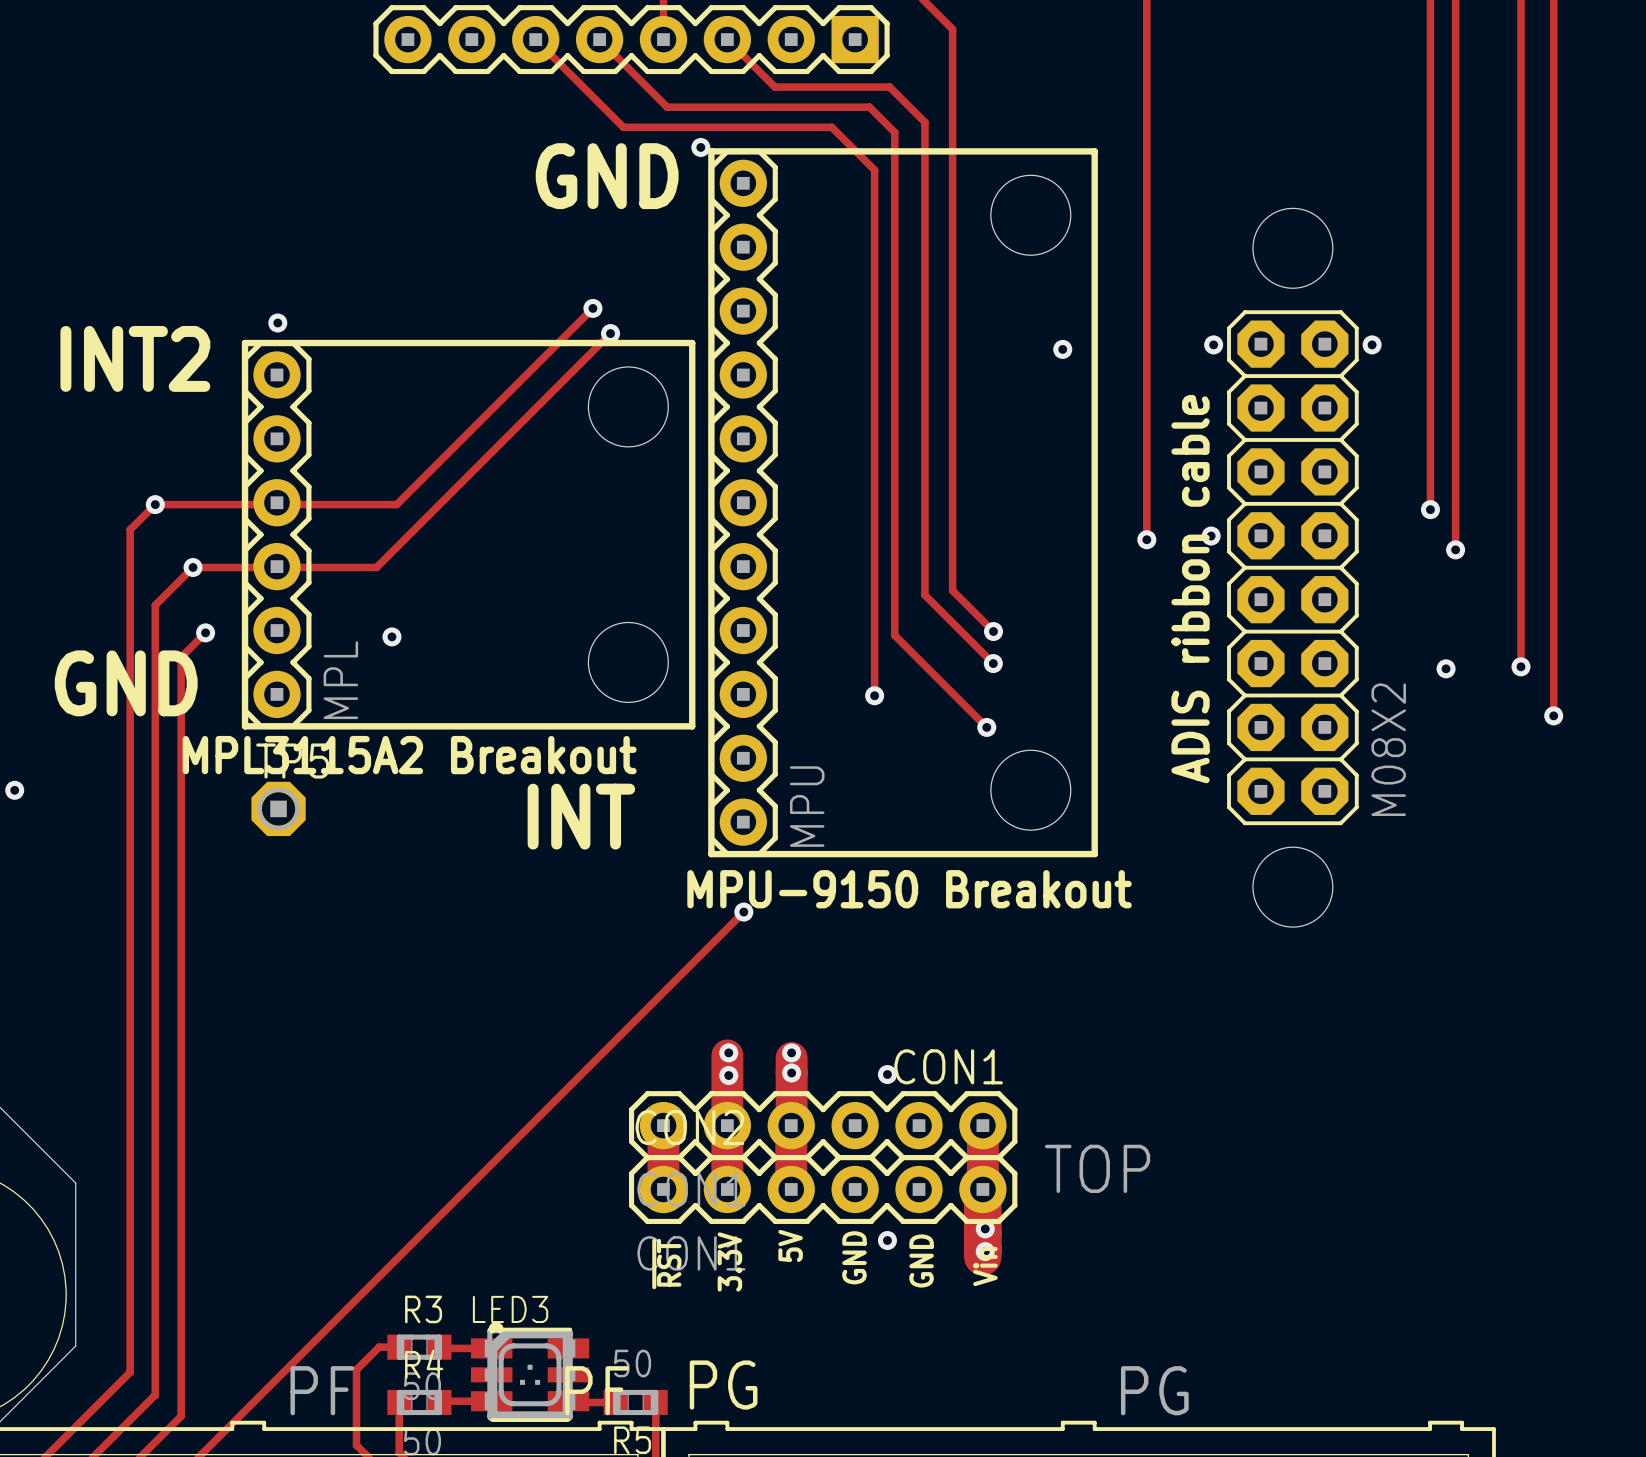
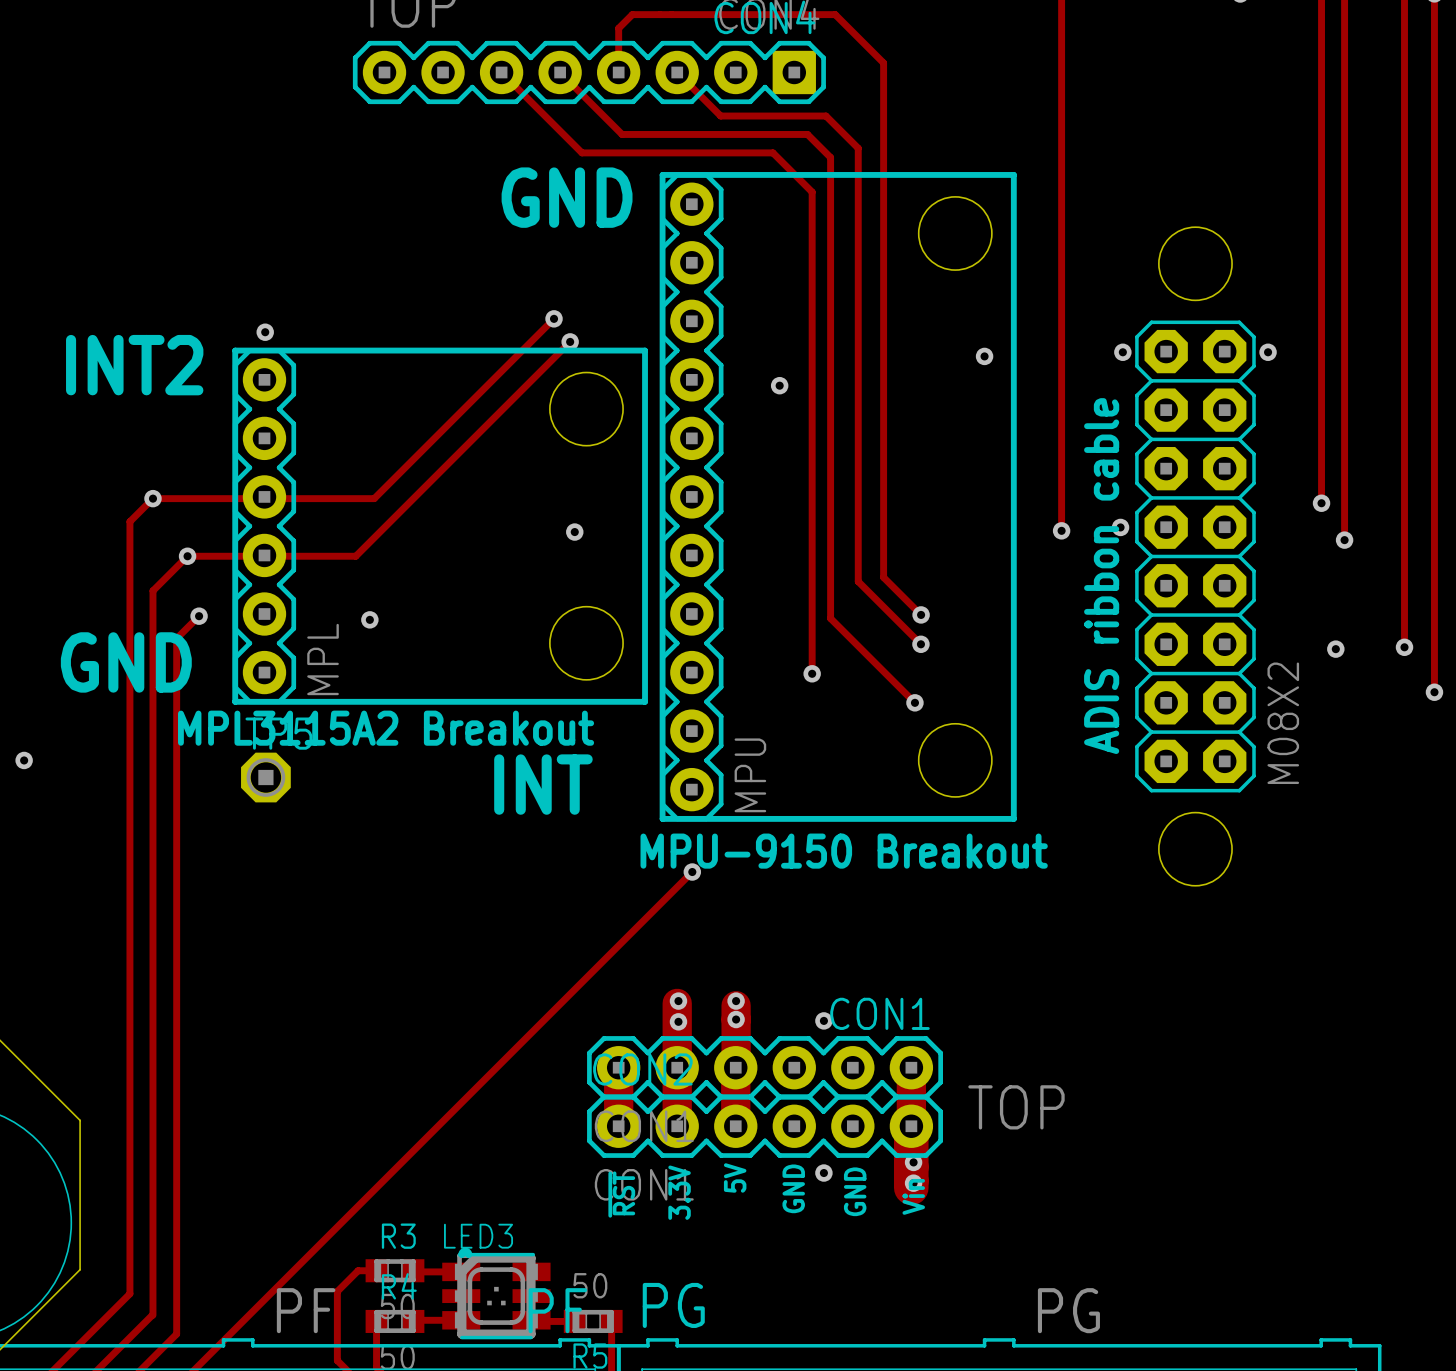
via: (700, 147) -> none
via: none -> (779, 385)
via: none -> (574, 532)

